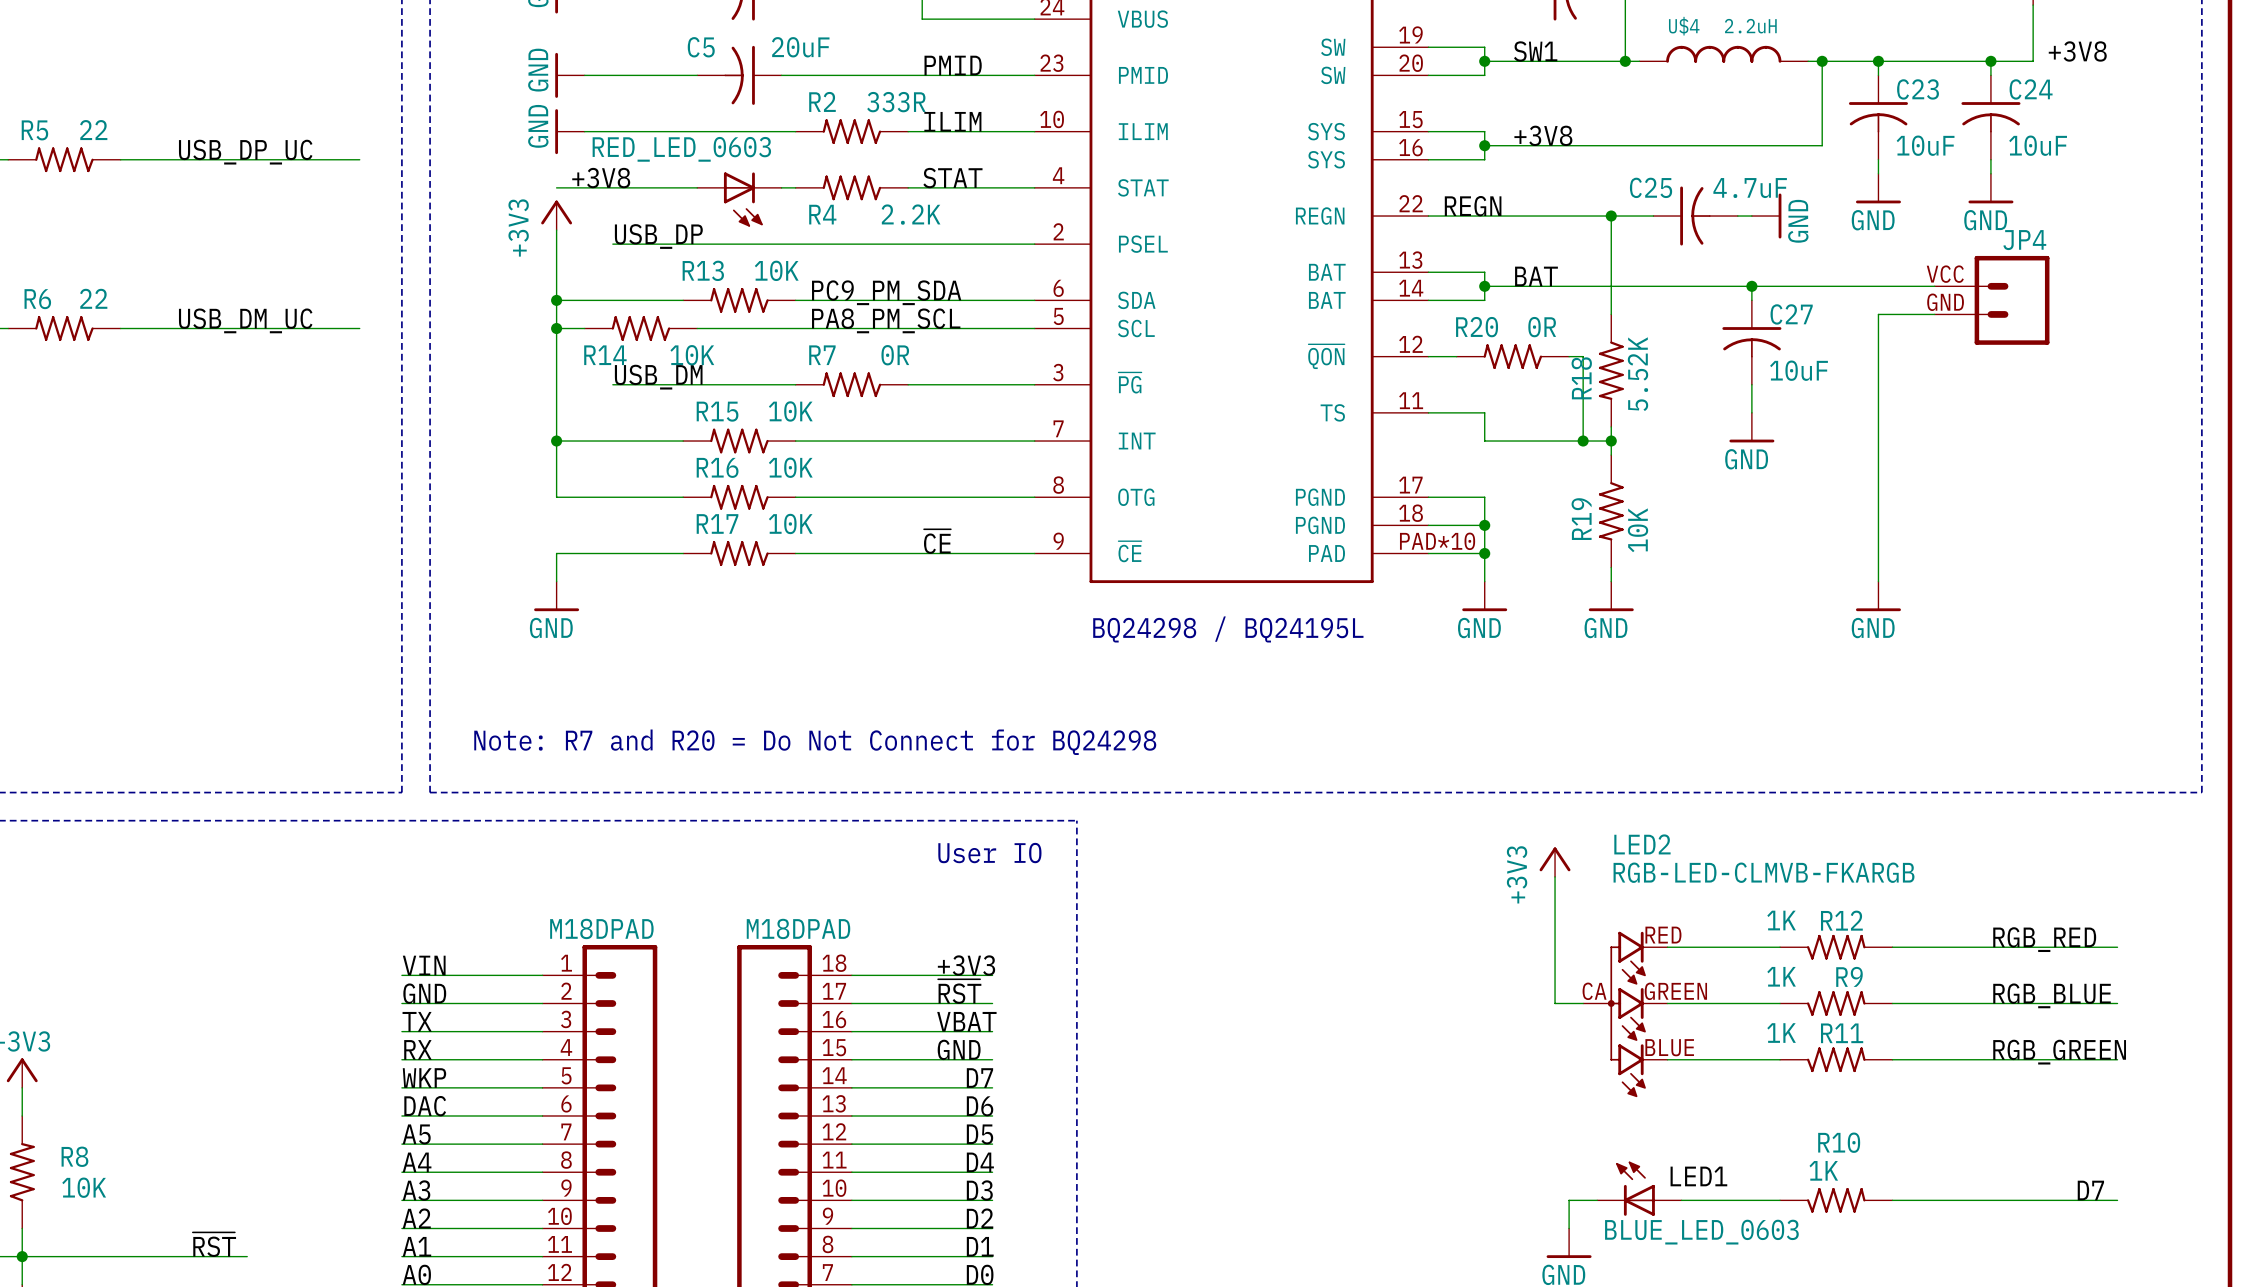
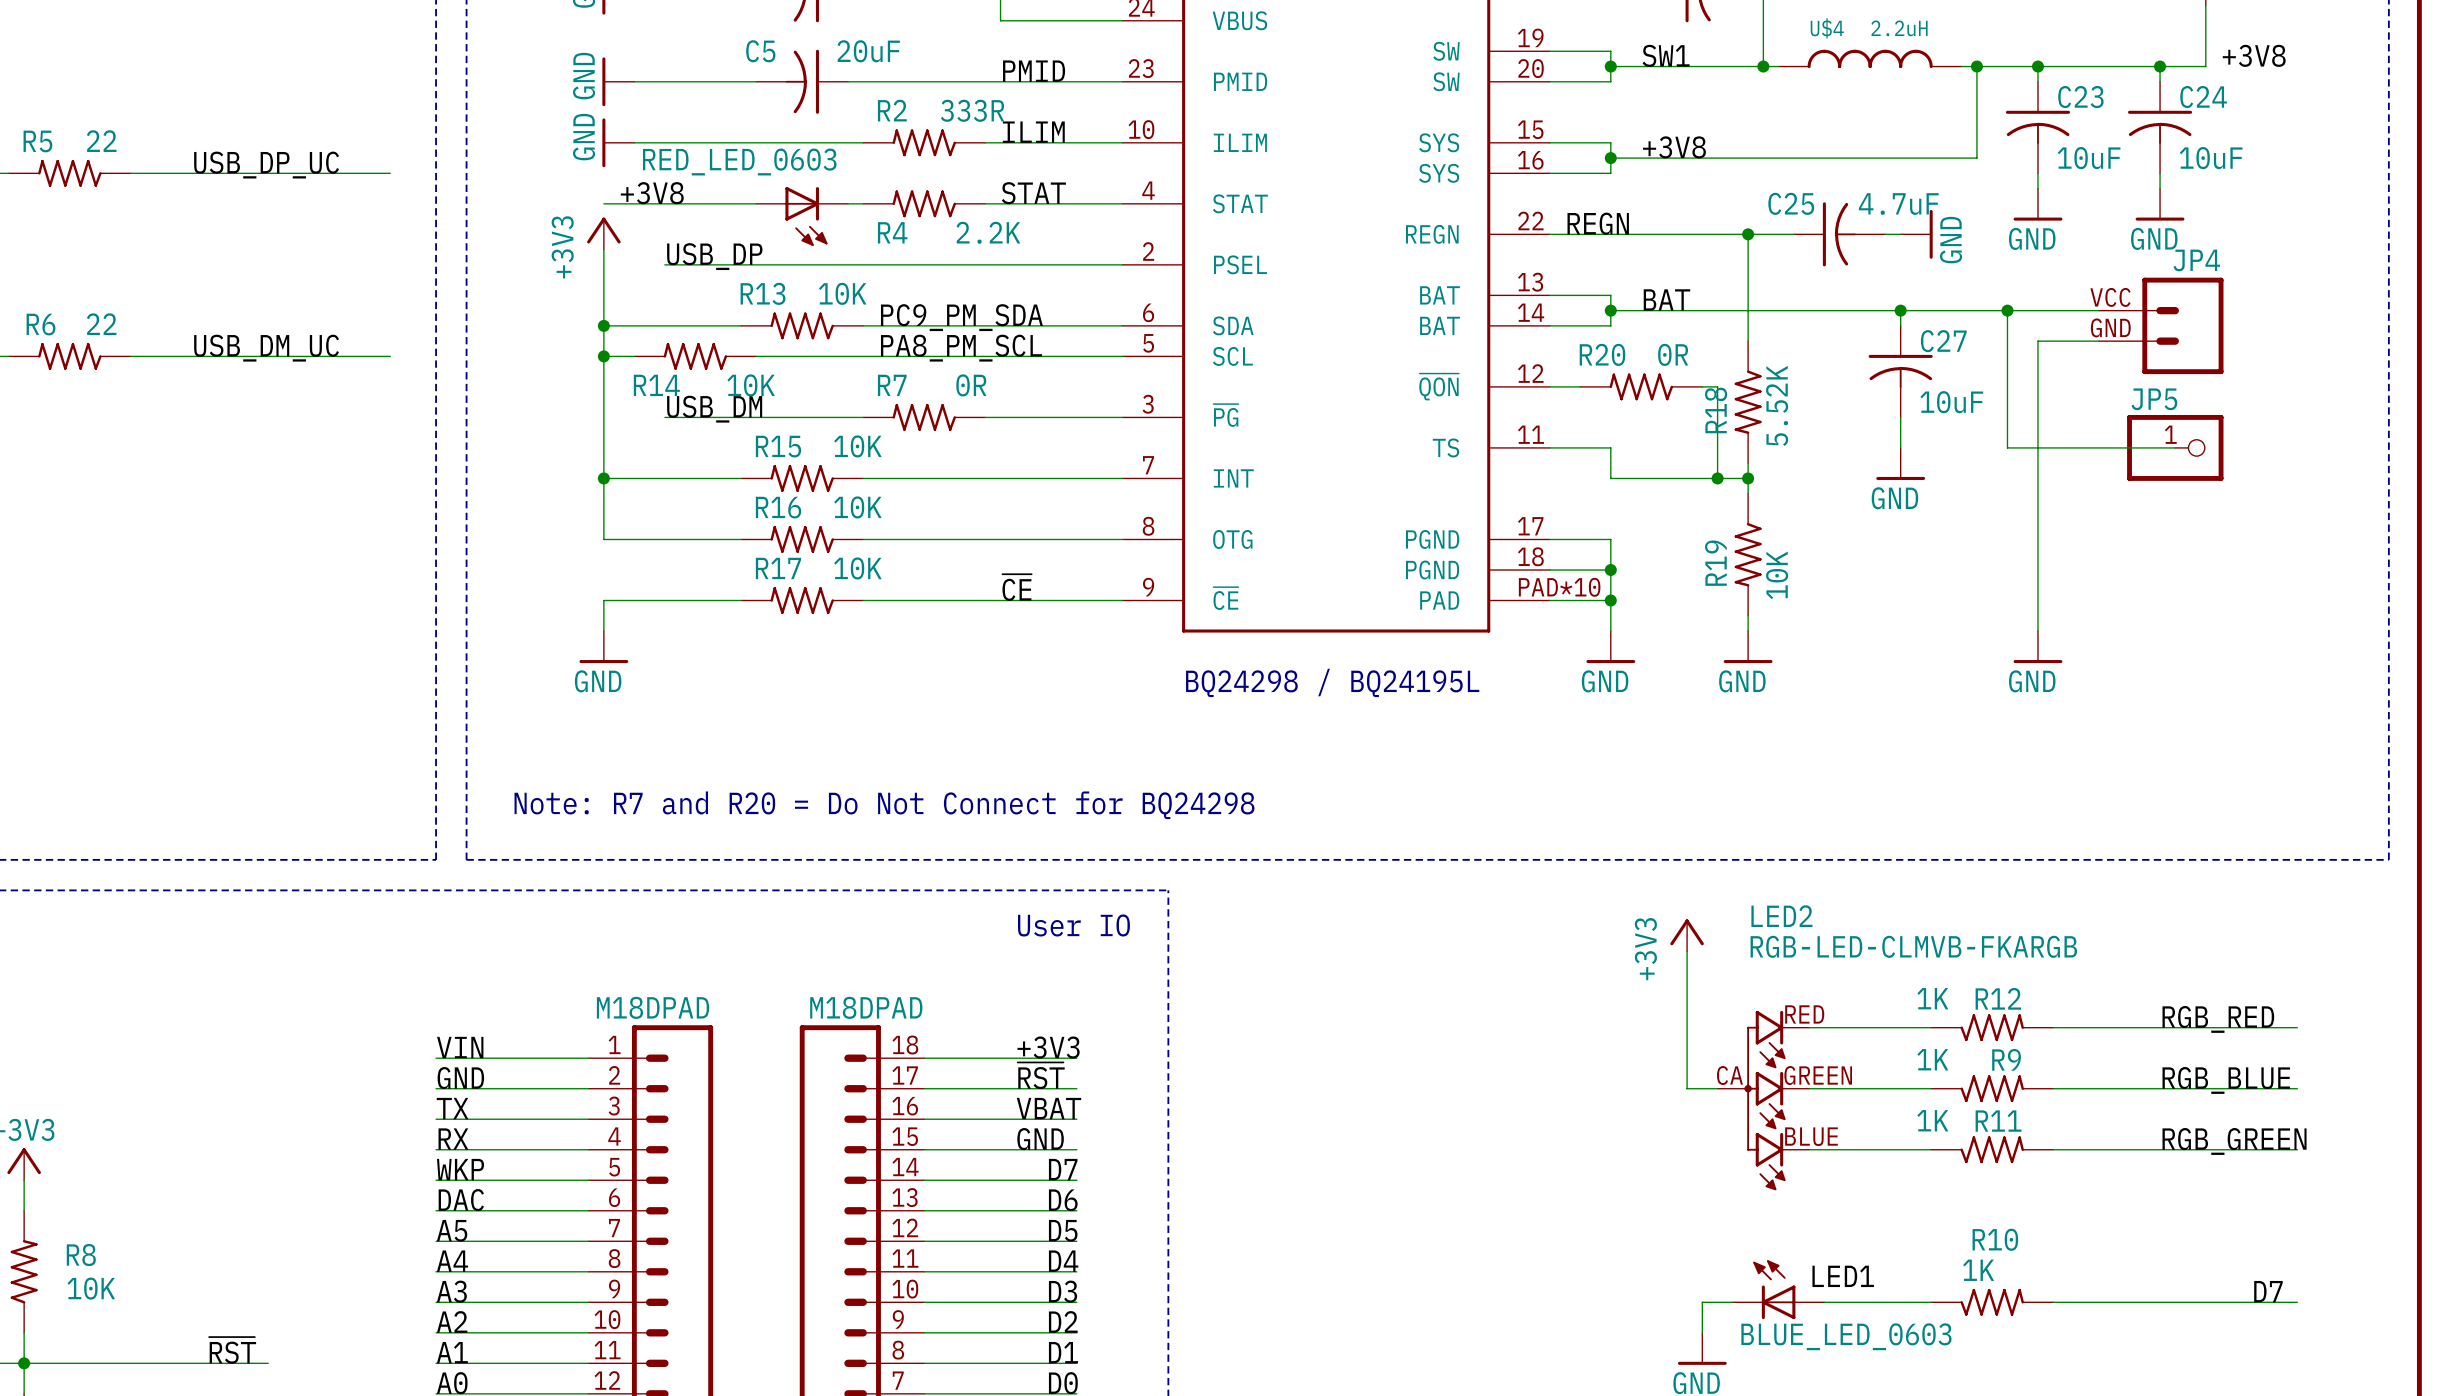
wire: none -> (2007, 310) (2007, 447) (2175, 447)
junction: none -> (2007, 310)
JP5: none -> (2175, 447)

